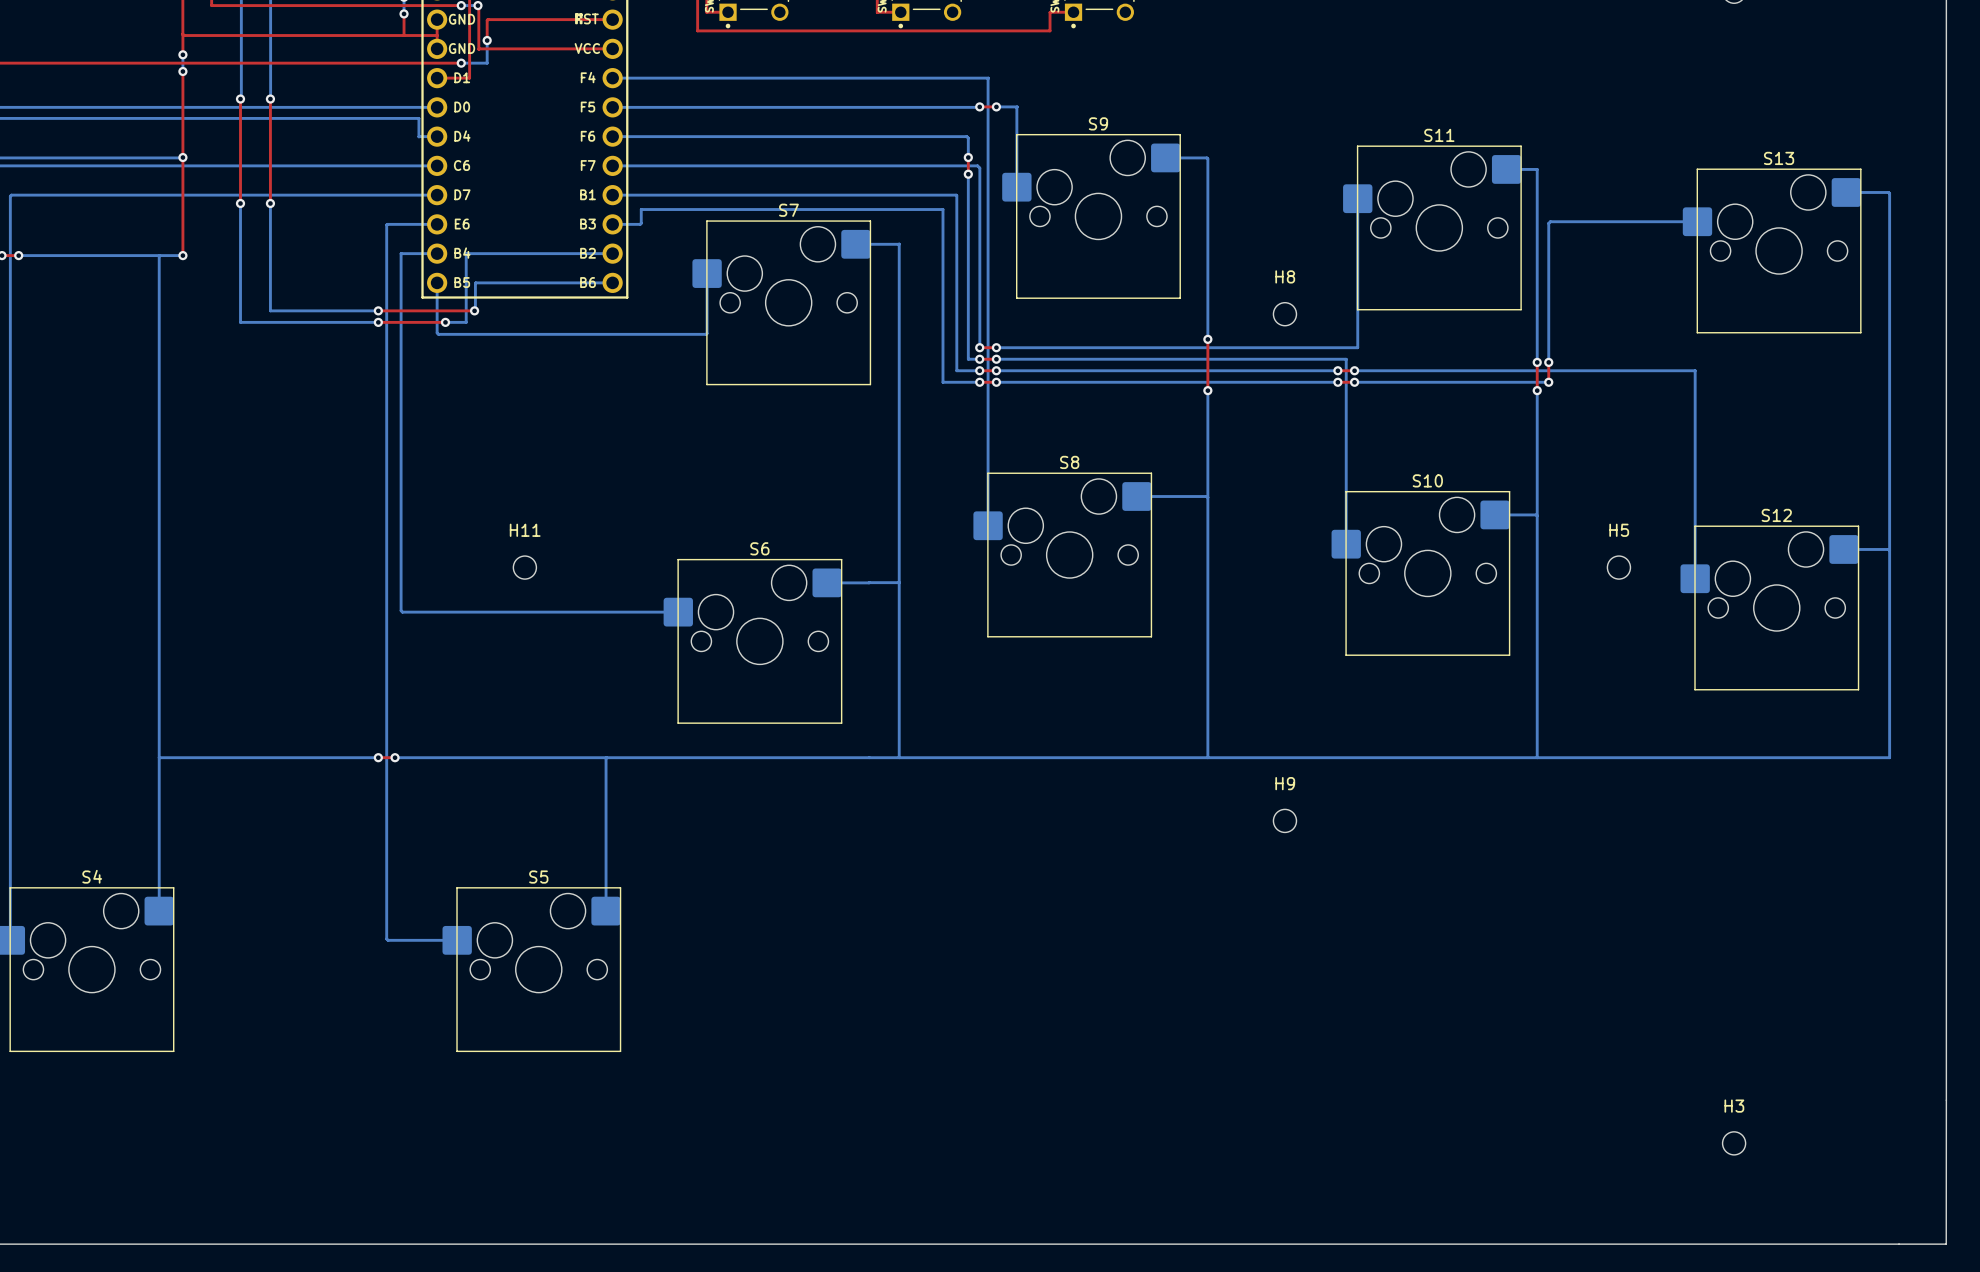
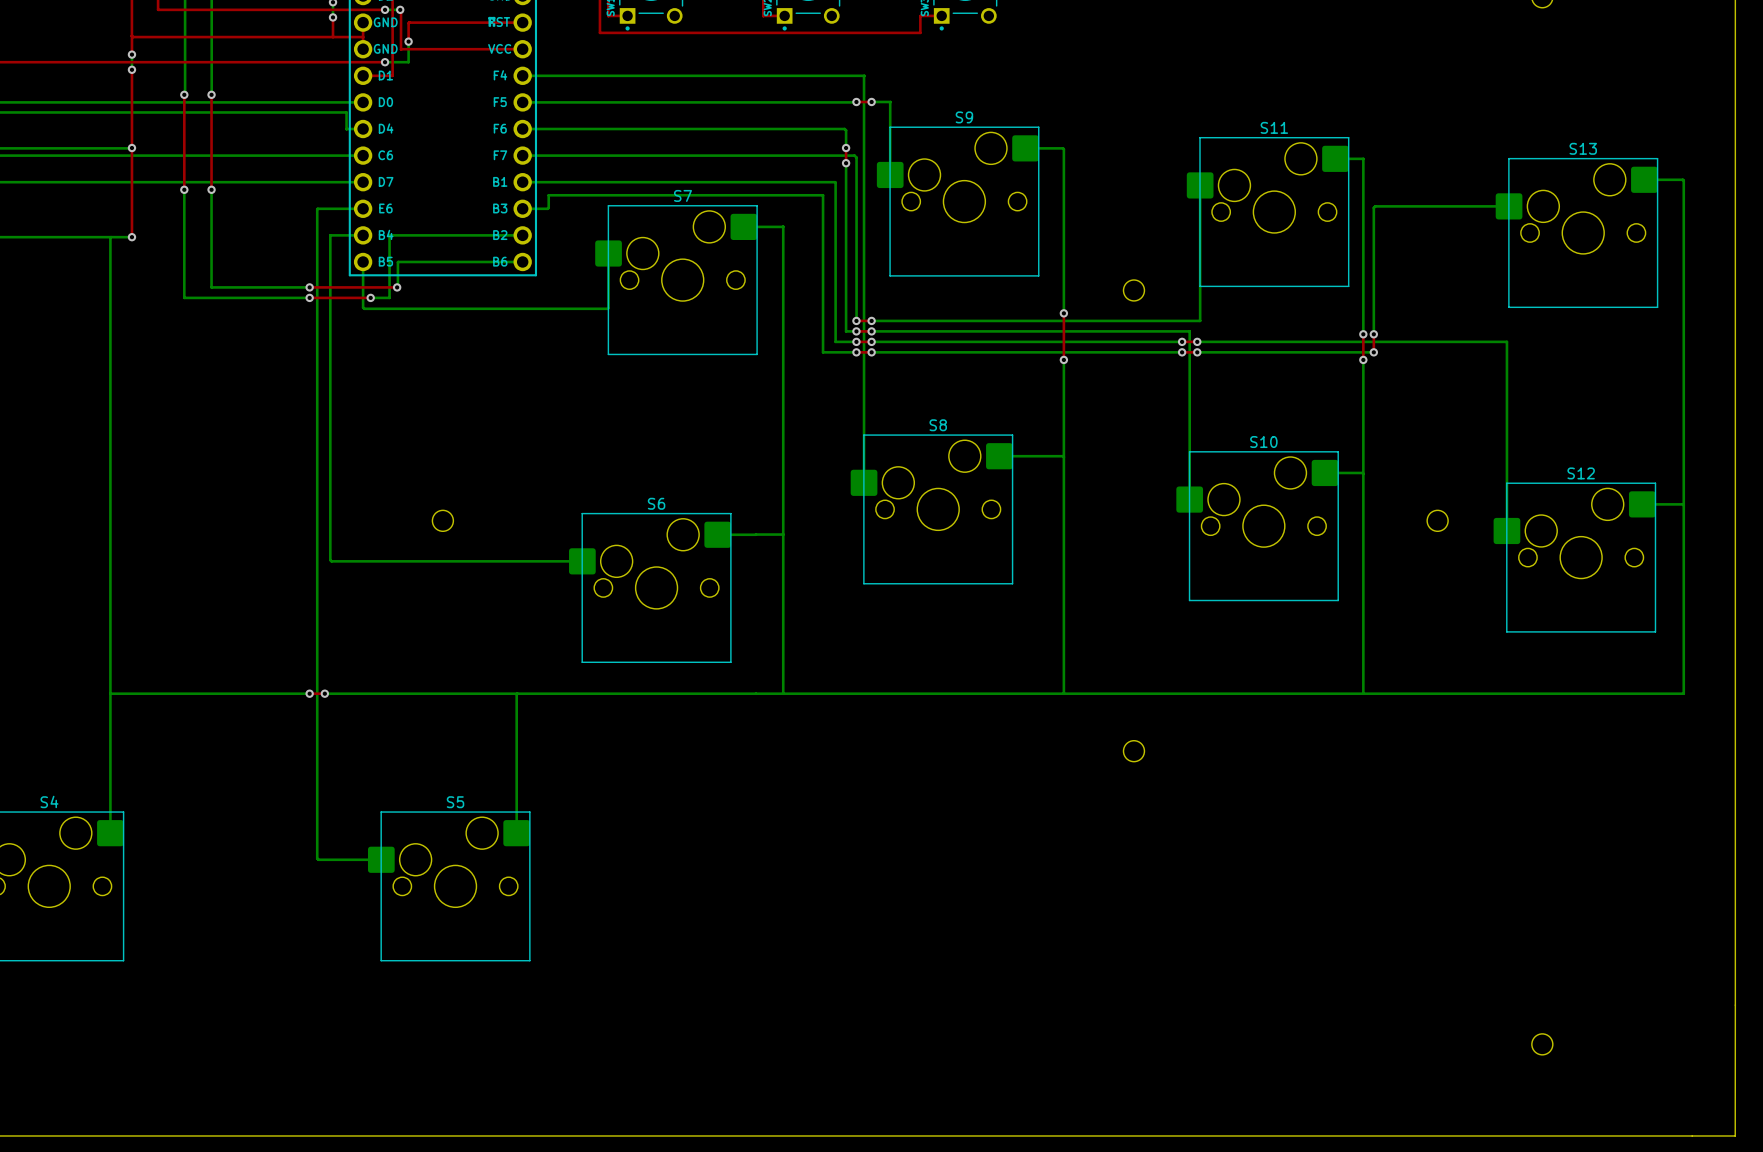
H8 name: H8 (1285, 276) -> none
H11 name: H11 (525, 530) -> none
H5 name: H5 (1619, 530) -> none
H9 name: H9 (1285, 783) -> none
H3 name: H3 (1734, 1106) -> none

